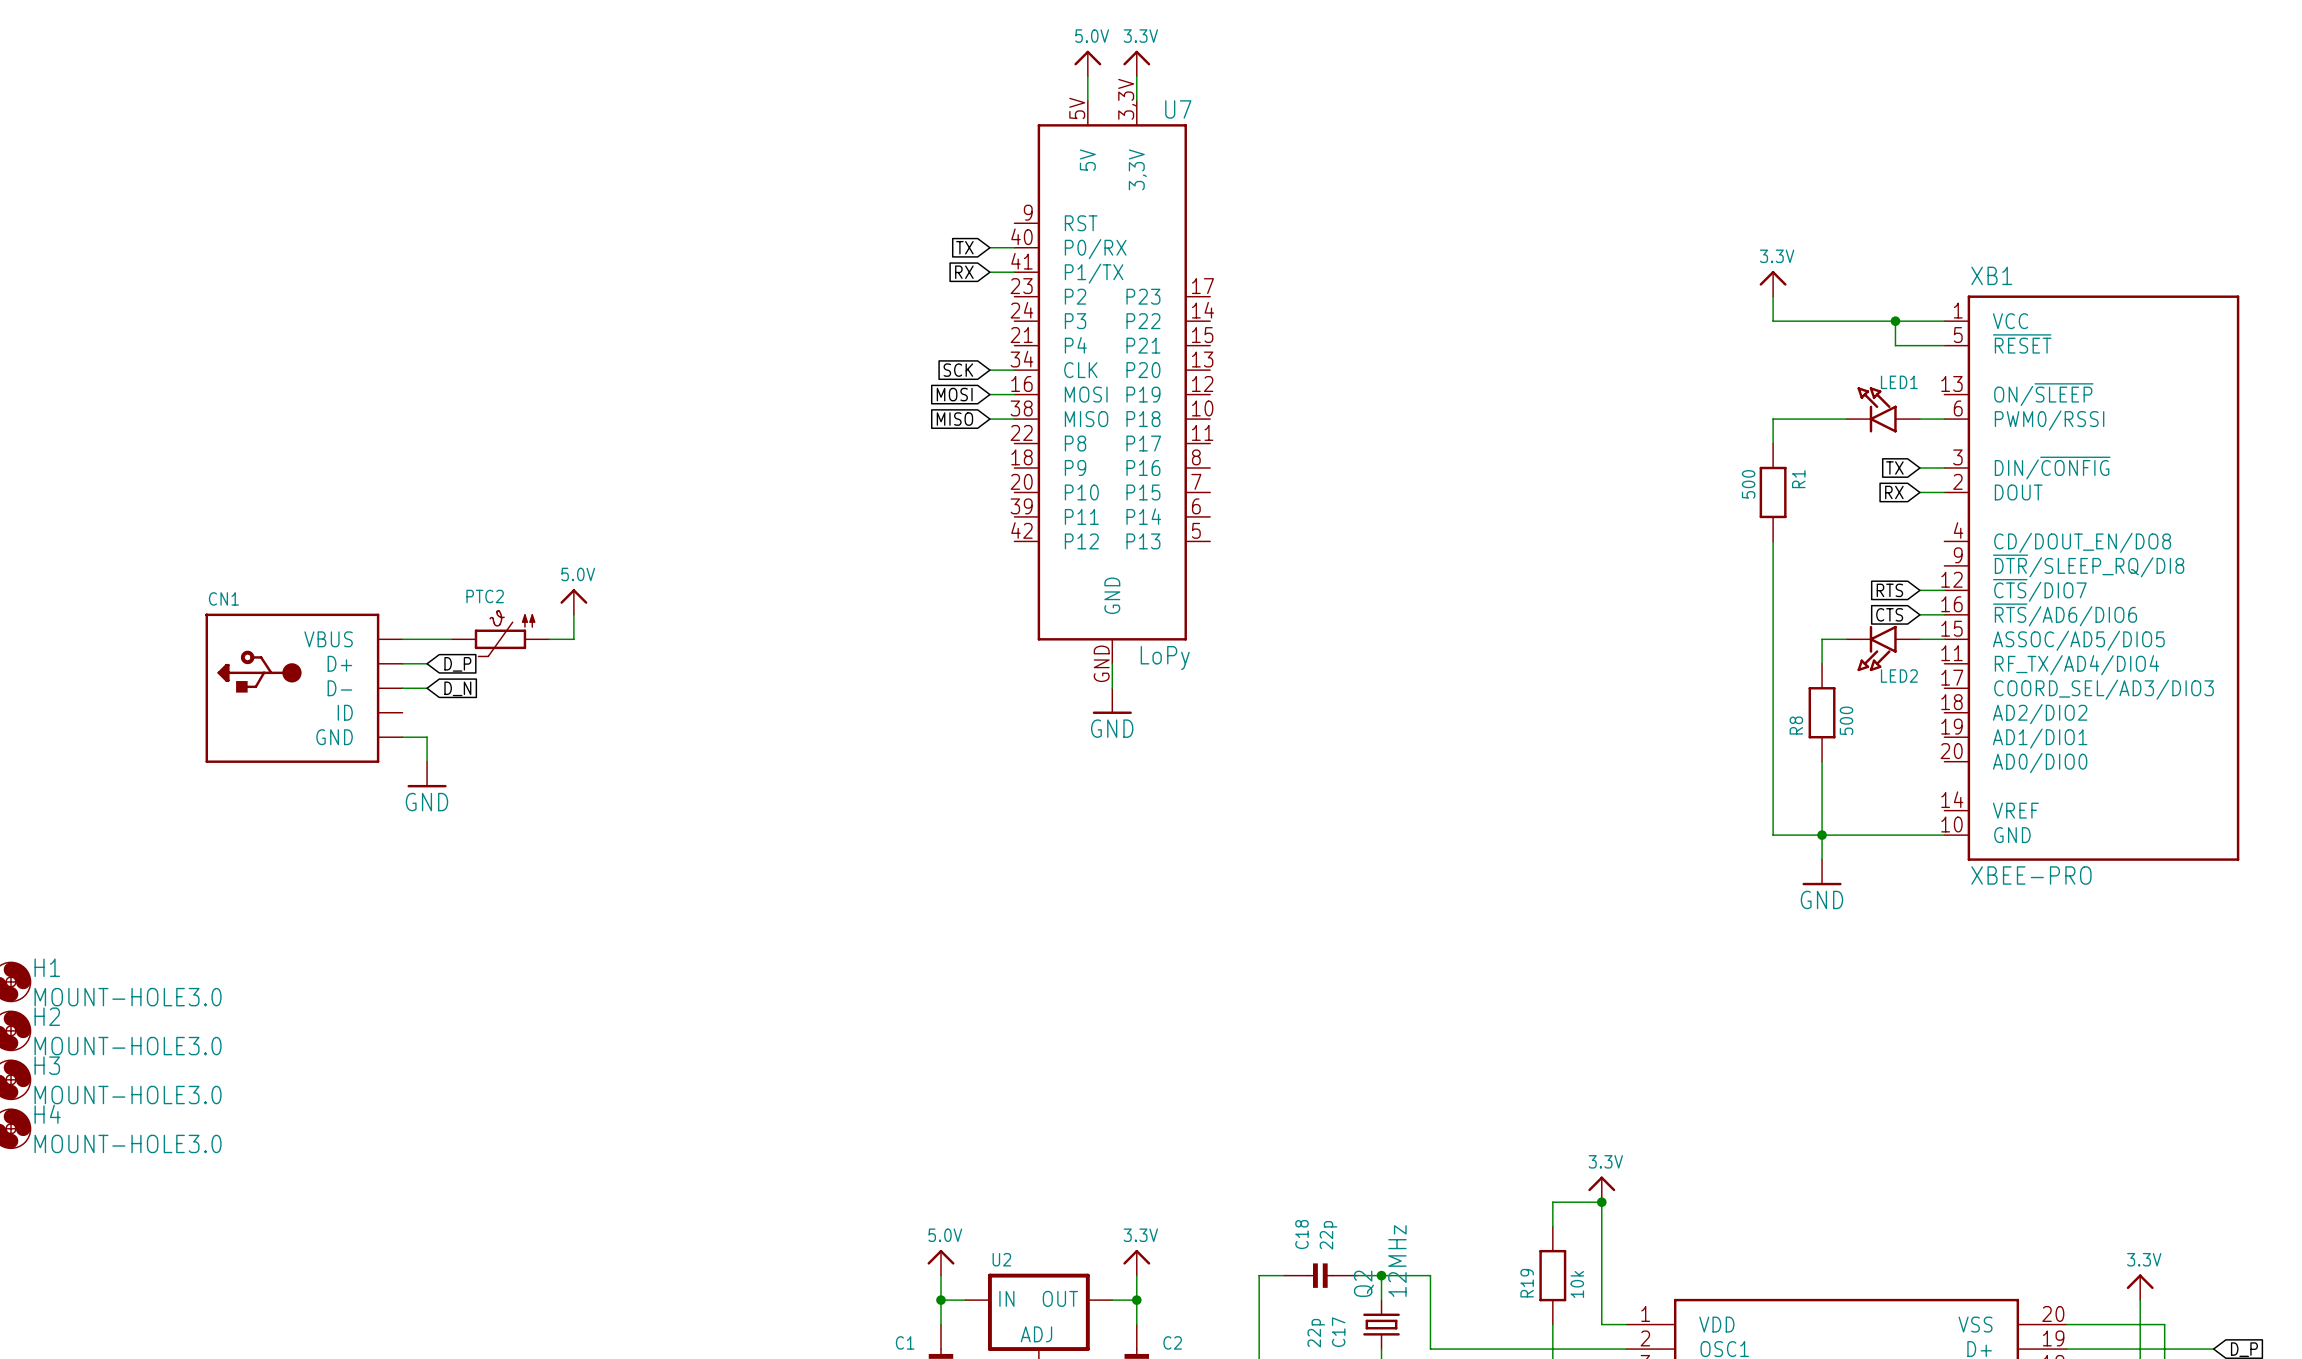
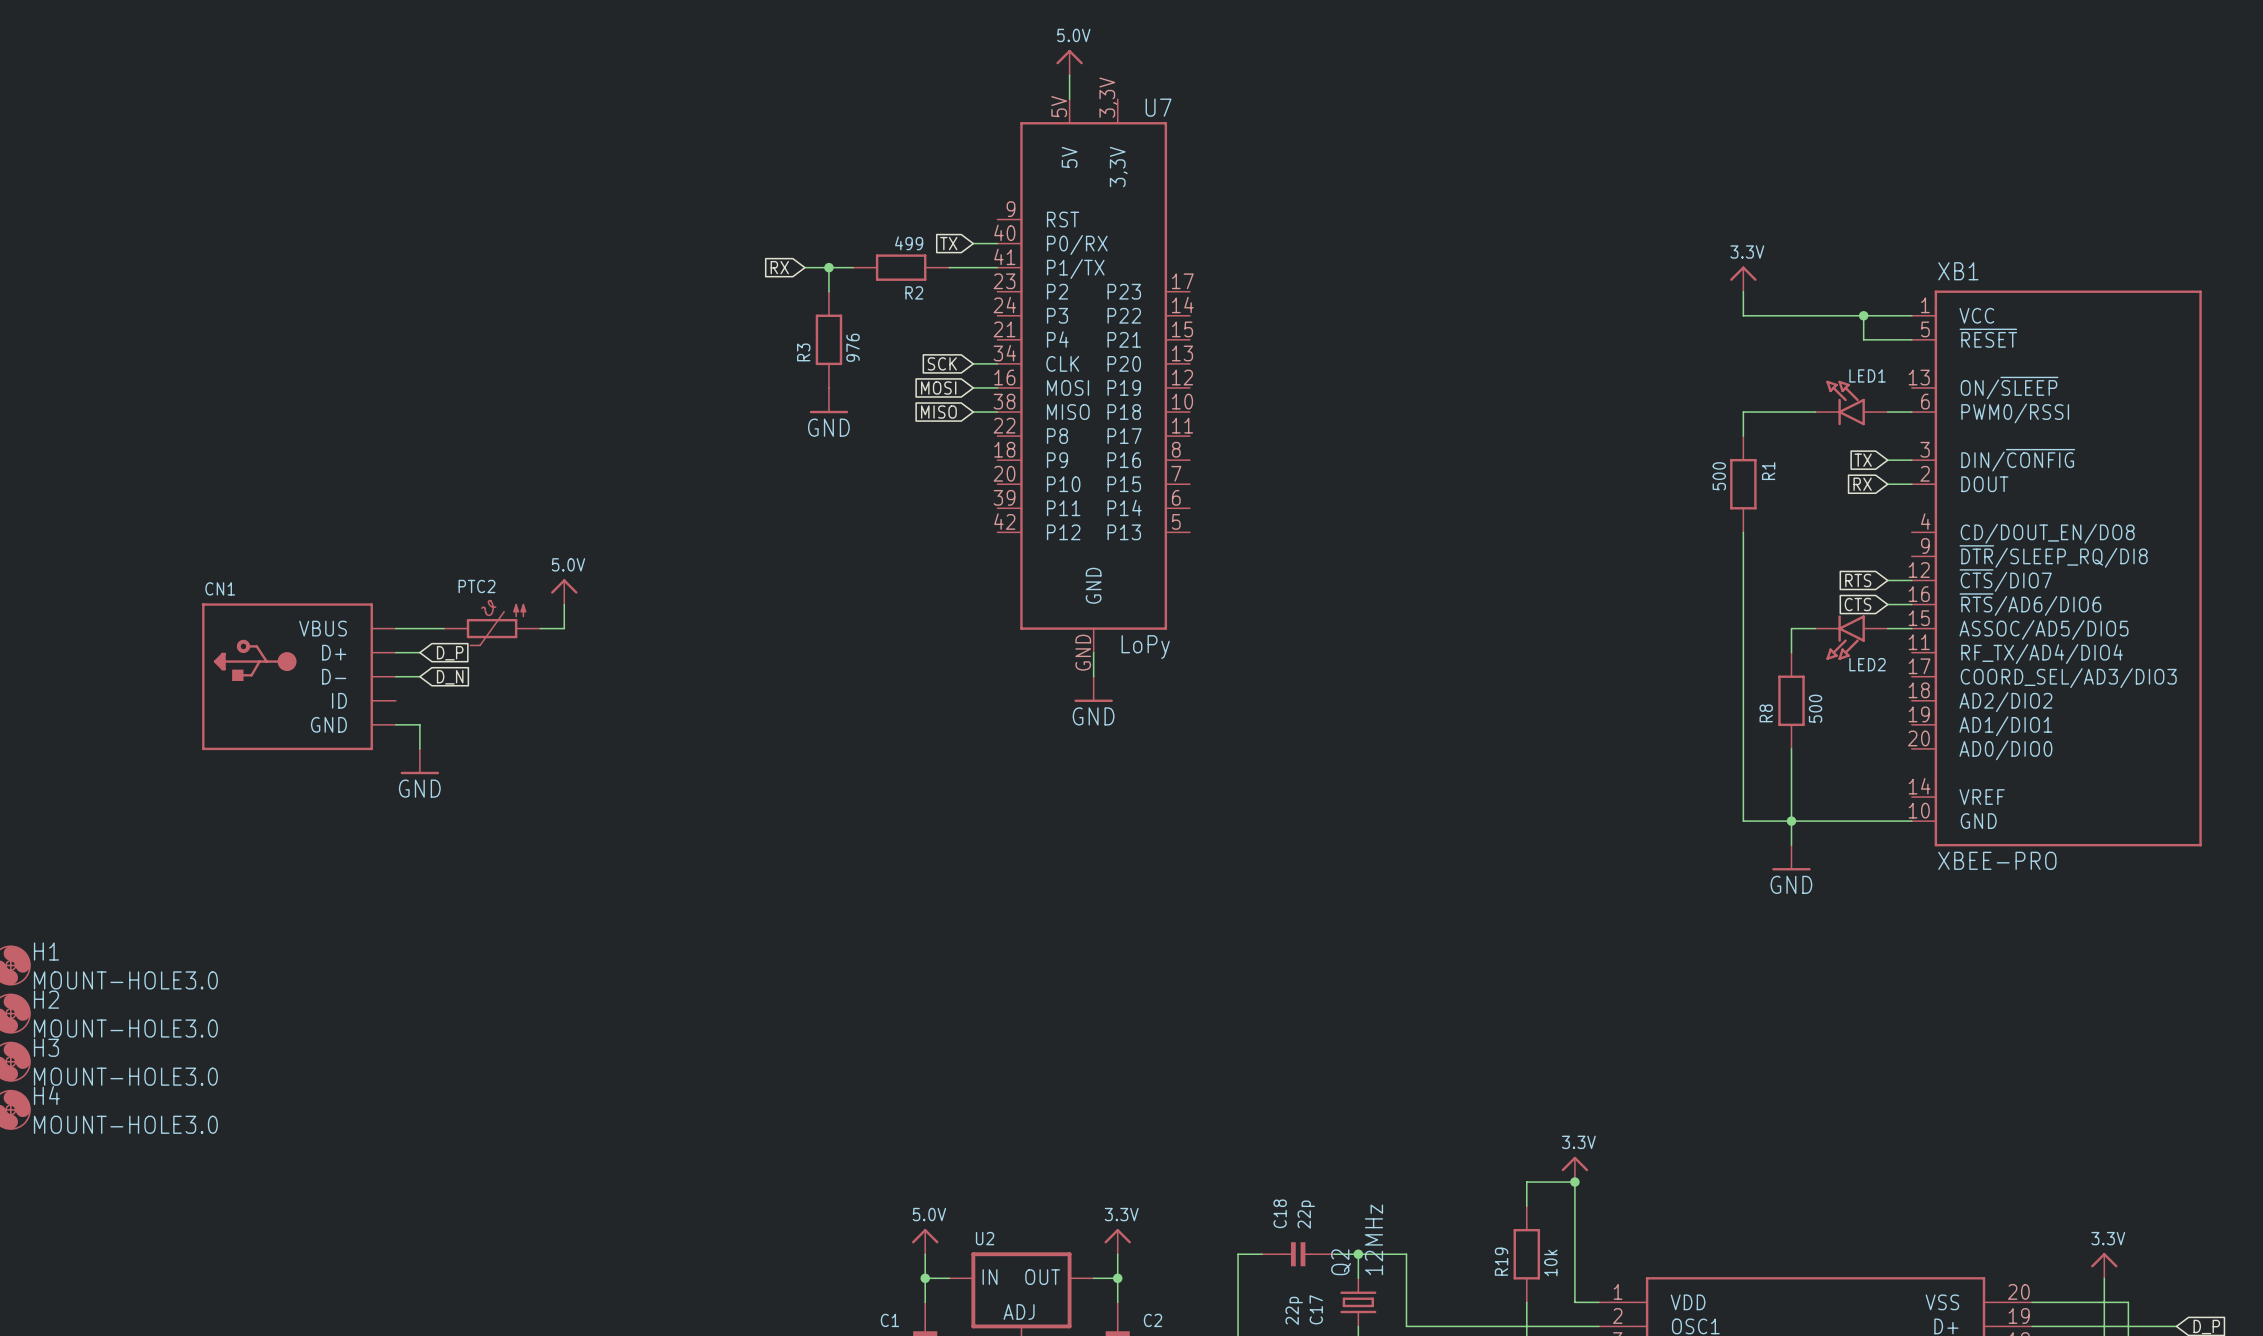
power symbol: 3.3V (1136, 63) -> none
wire: (1136, 76) (1136, 100) -> none
wire: none -> (804, 267) (853, 267)
wire: none -> (828, 267) (828, 291)
junction: none -> (828, 267)
R2: none -> 499 (901, 267)
global label position: RX (964, 272) -> RX (779, 267)
wire: none -> (949, 267) (973, 267)
R3: none -> 976 (828, 339)
power symbol: none -> GND (828, 400)

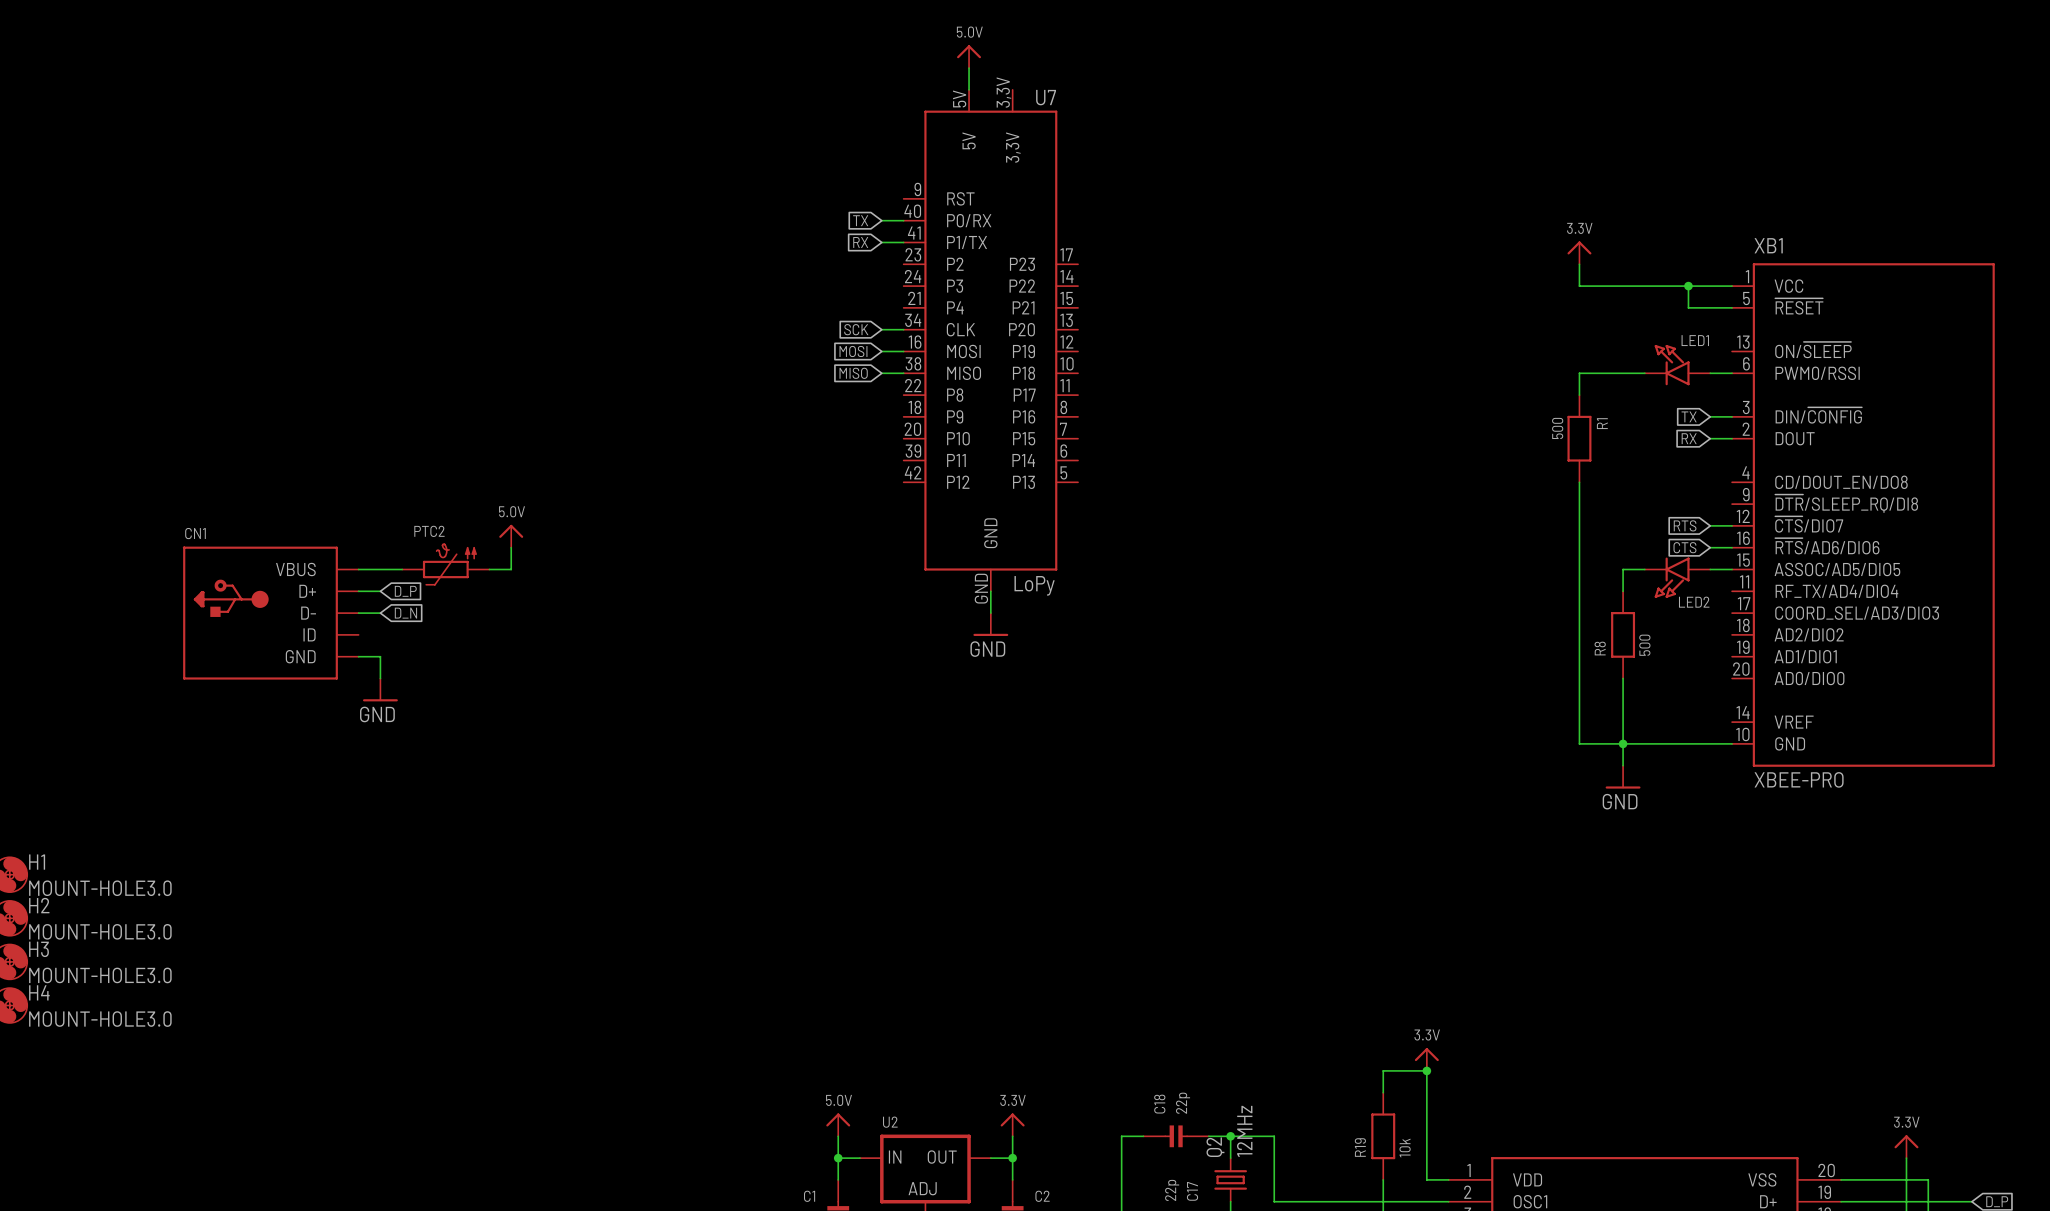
global label position: RX (779, 267) -> RX (860, 242)
wire: (804, 267) (853, 267) -> none
wire: (828, 267) (828, 291) -> none
junction: (828, 267) -> none
R2: 499 (901, 267) -> none
wire: (949, 267) (973, 267) -> none
R3: 976 (828, 339) -> none
power symbol: GND (828, 400) -> none

